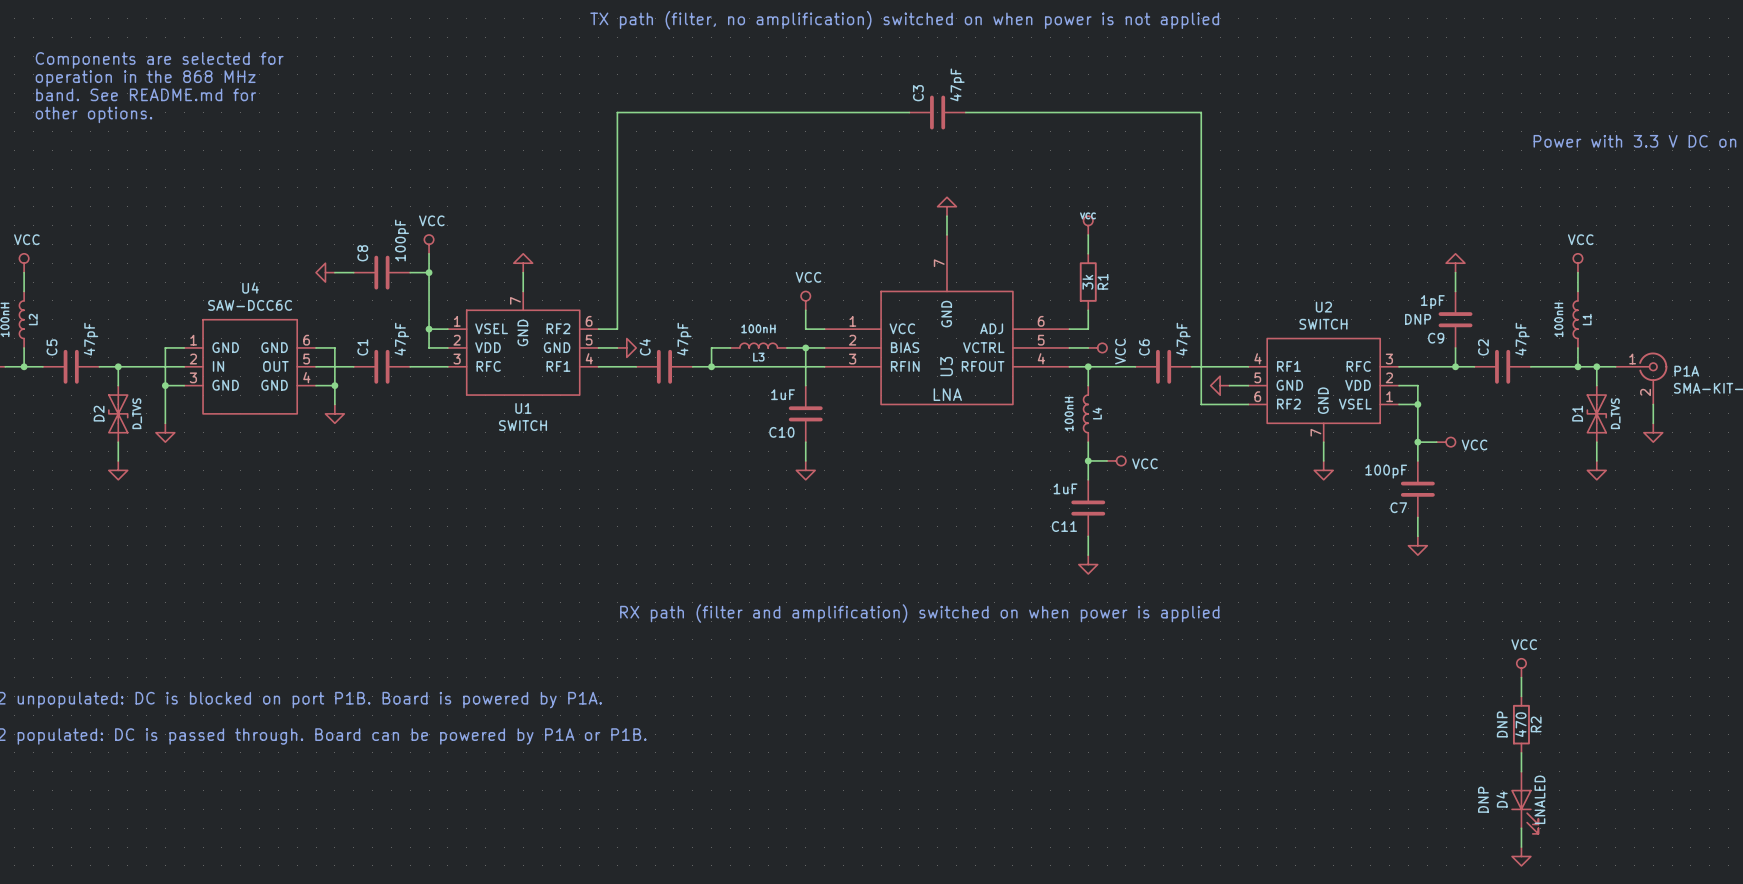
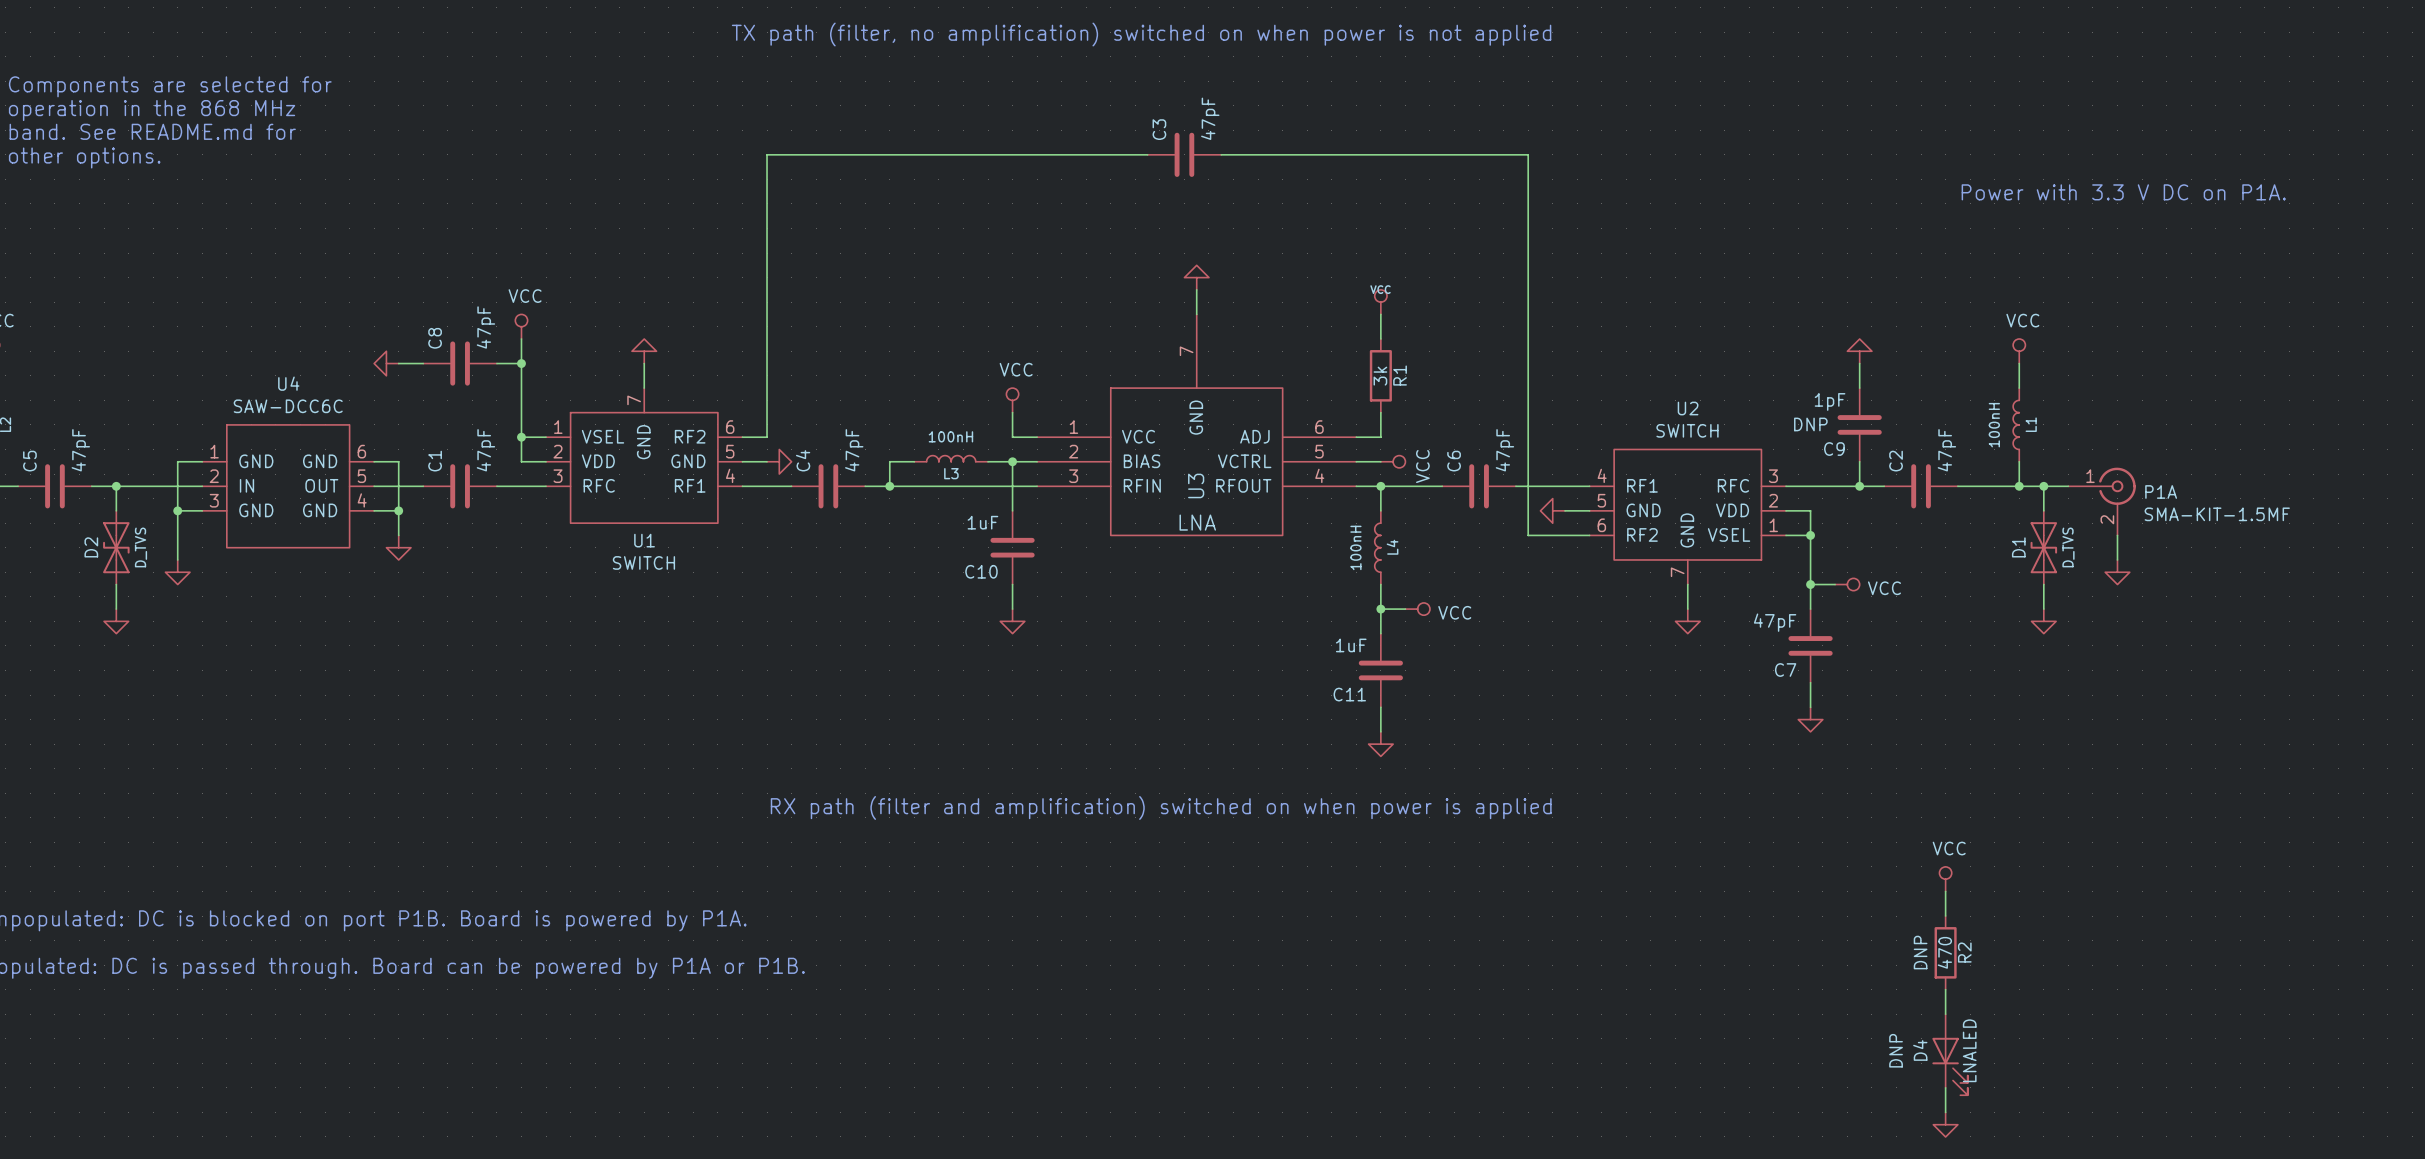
C8 value: 100pF (402, 240) -> 47pF (485, 327)
C7 value: 100pF (1386, 471) -> 47pF (1775, 622)

